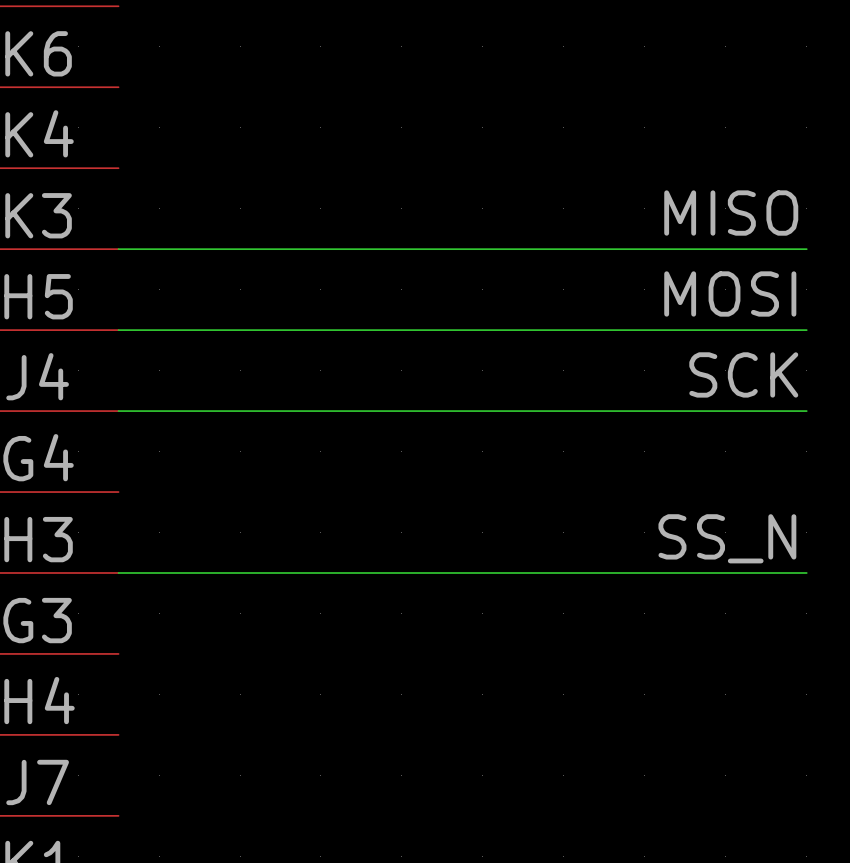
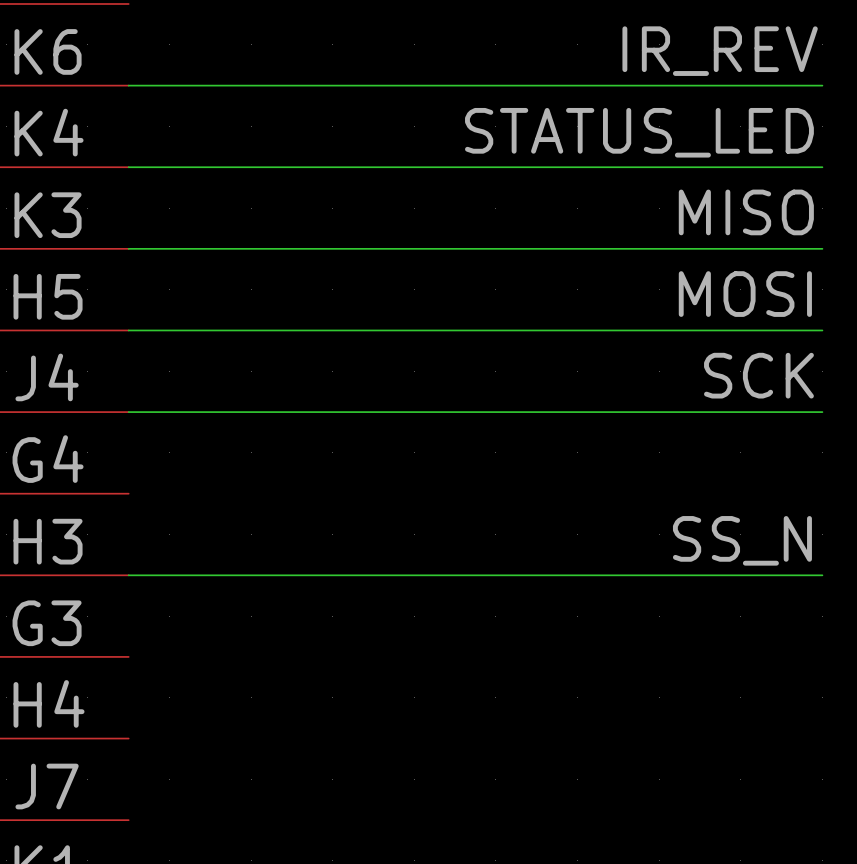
label: none -> IR_REV (720, 51)
wire: none -> (128, 85) (822, 85)
label: none -> STATUS_LED (639, 132)
wire: none -> (128, 167) (822, 167)

